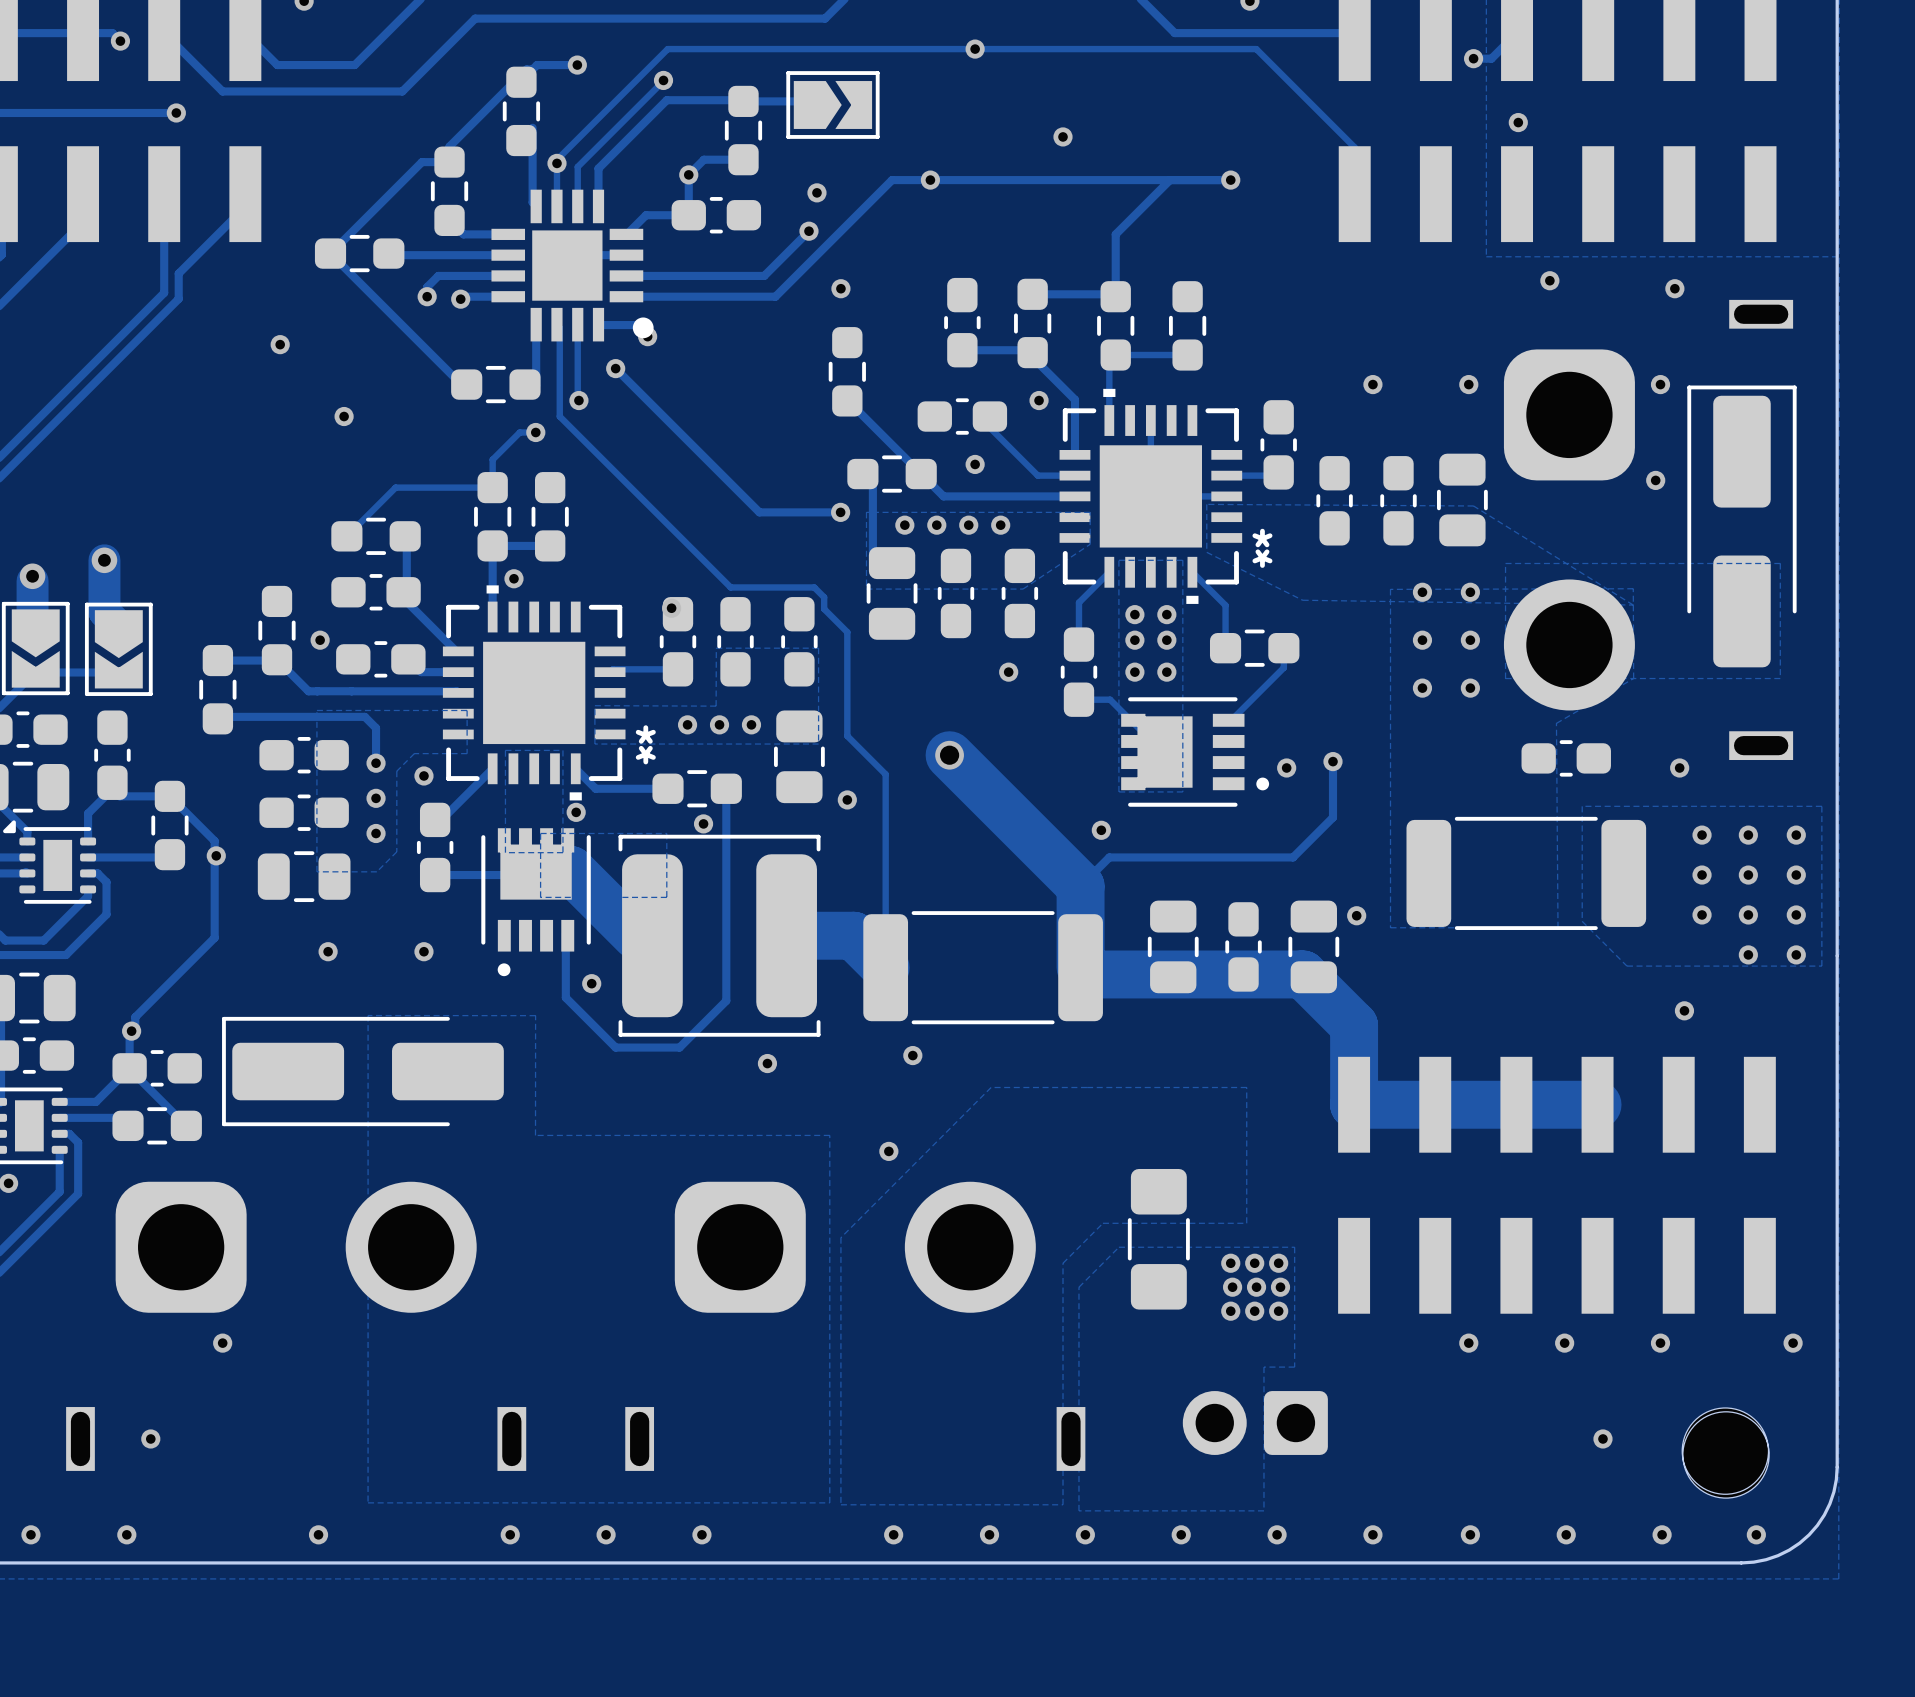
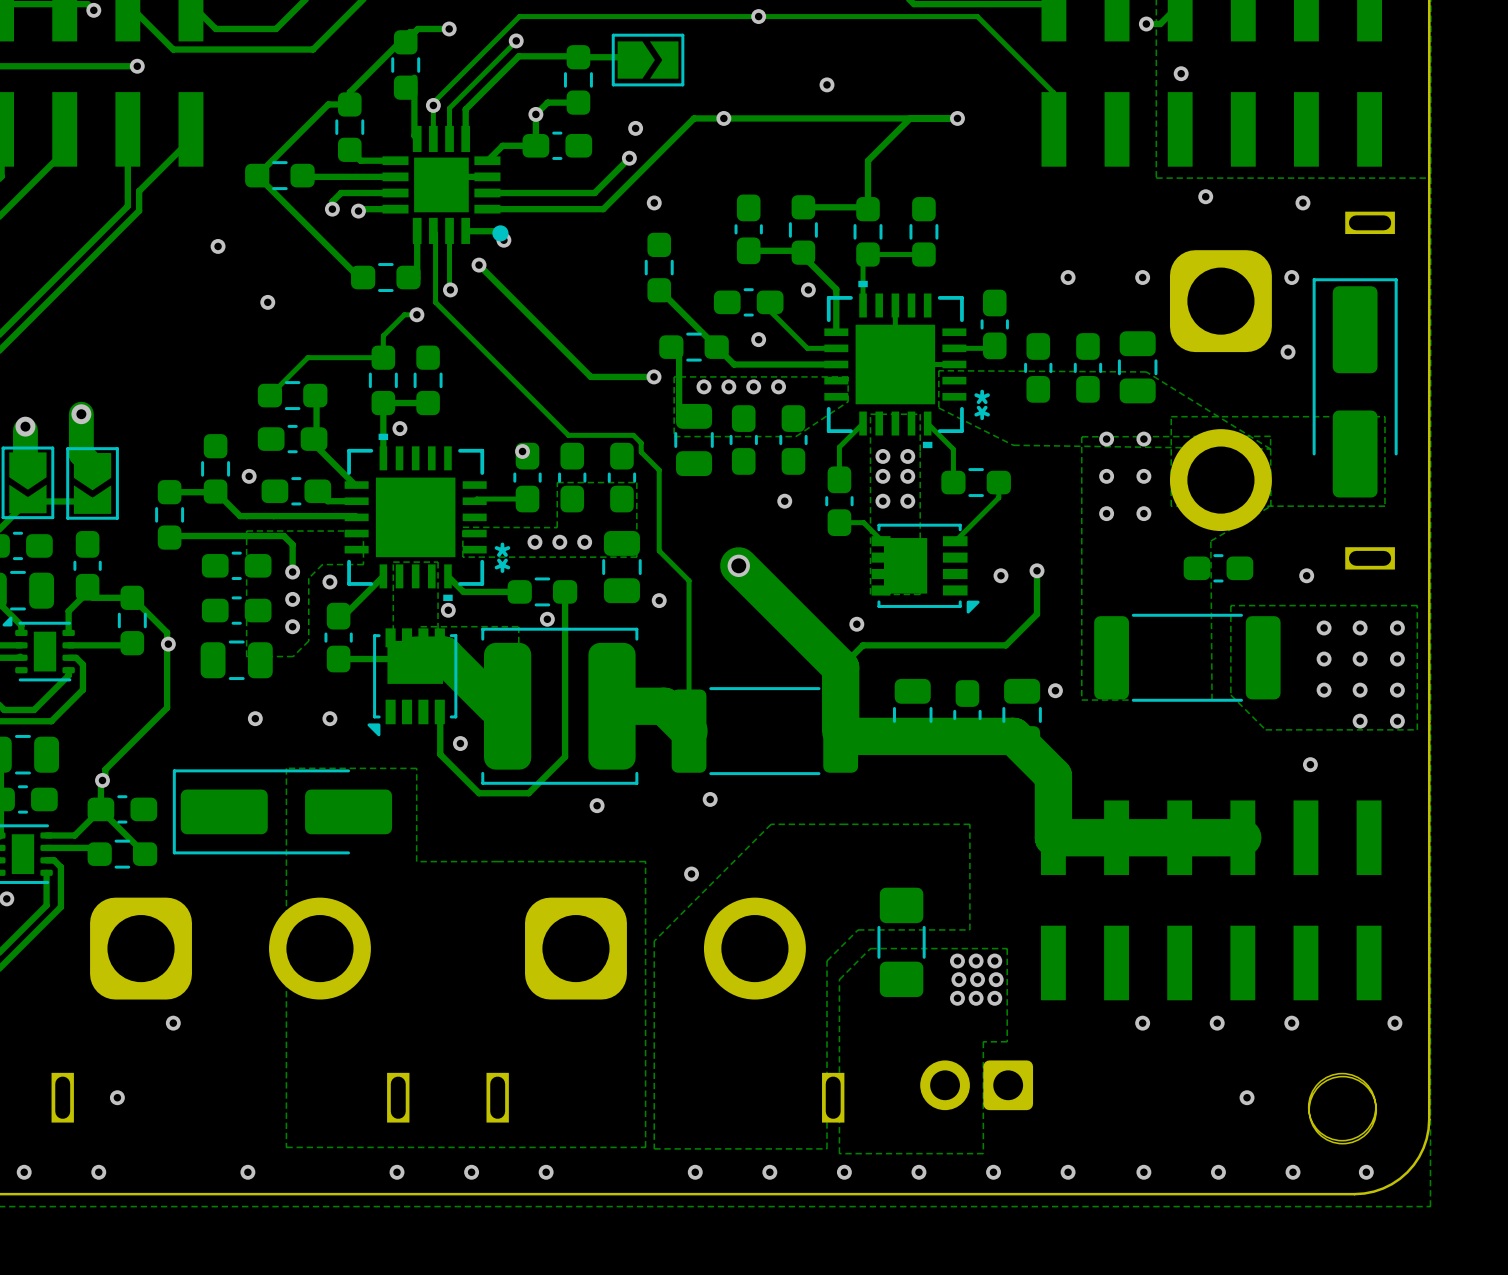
part footprint: [1121, 697, 1270, 807] -> [871, 523, 980, 614]
part footprint: [481, 828, 591, 977] -> [367, 628, 458, 737]

